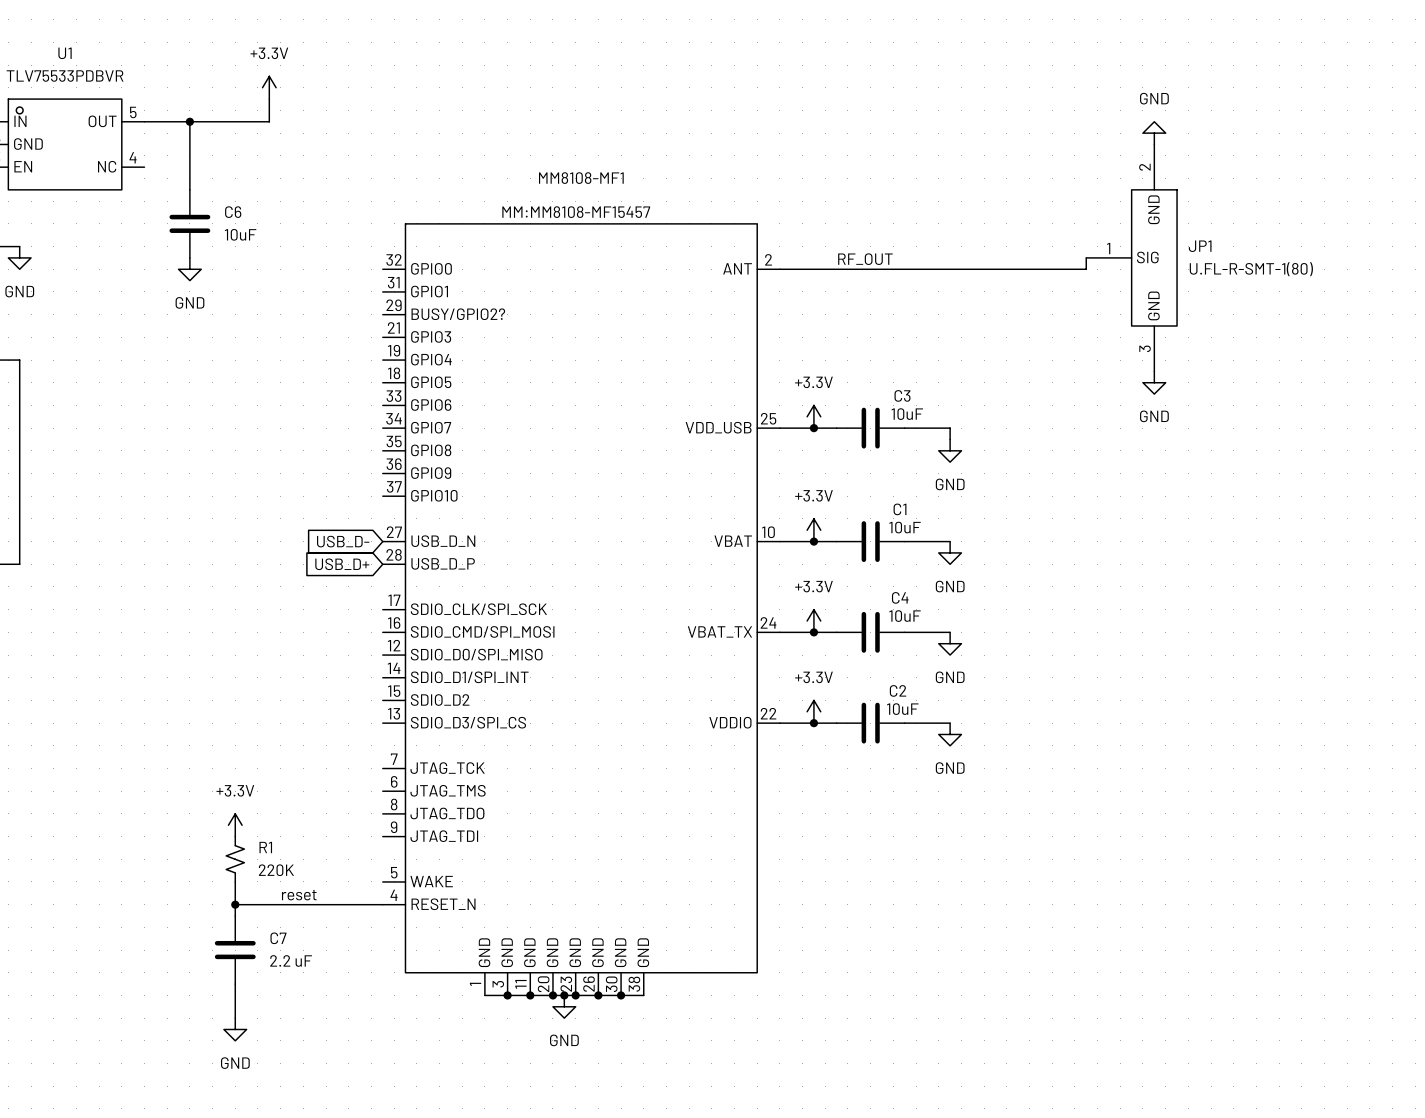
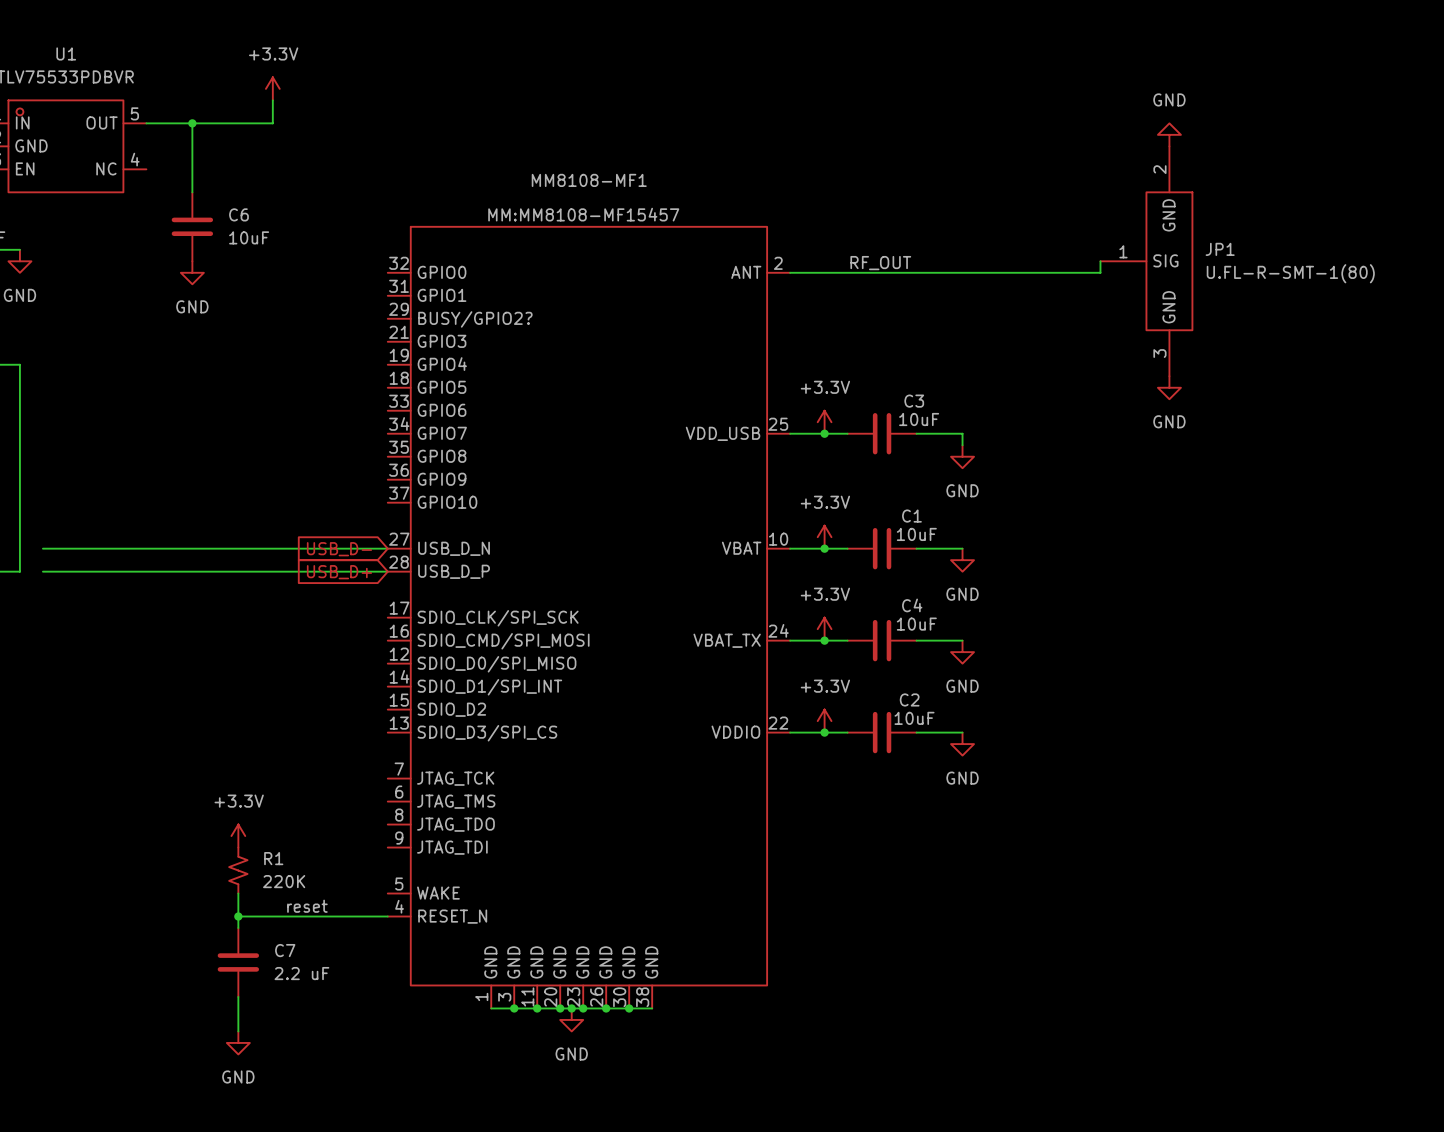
wire: none -> (42, 548) (387, 548)
wire: none -> (42, 571) (387, 571)

